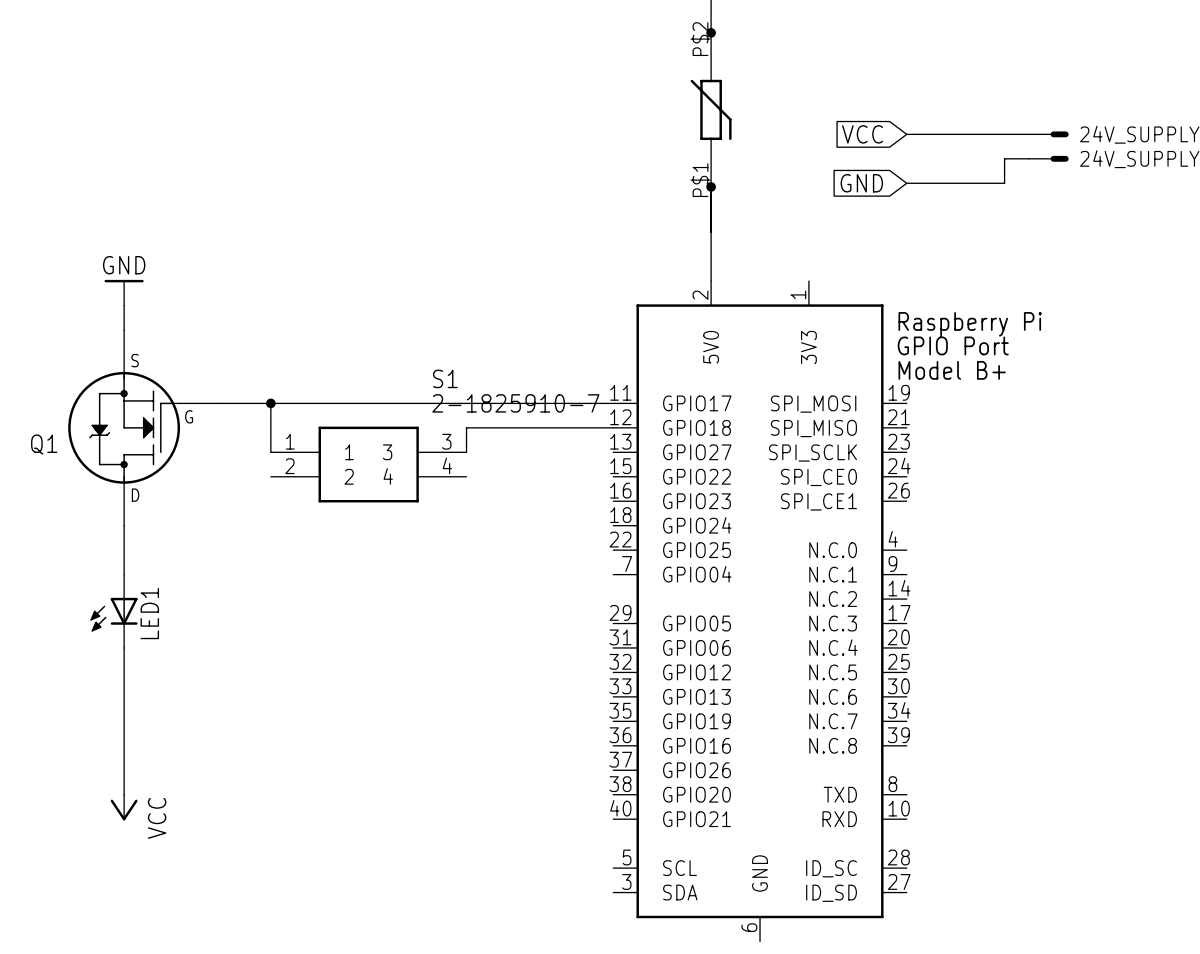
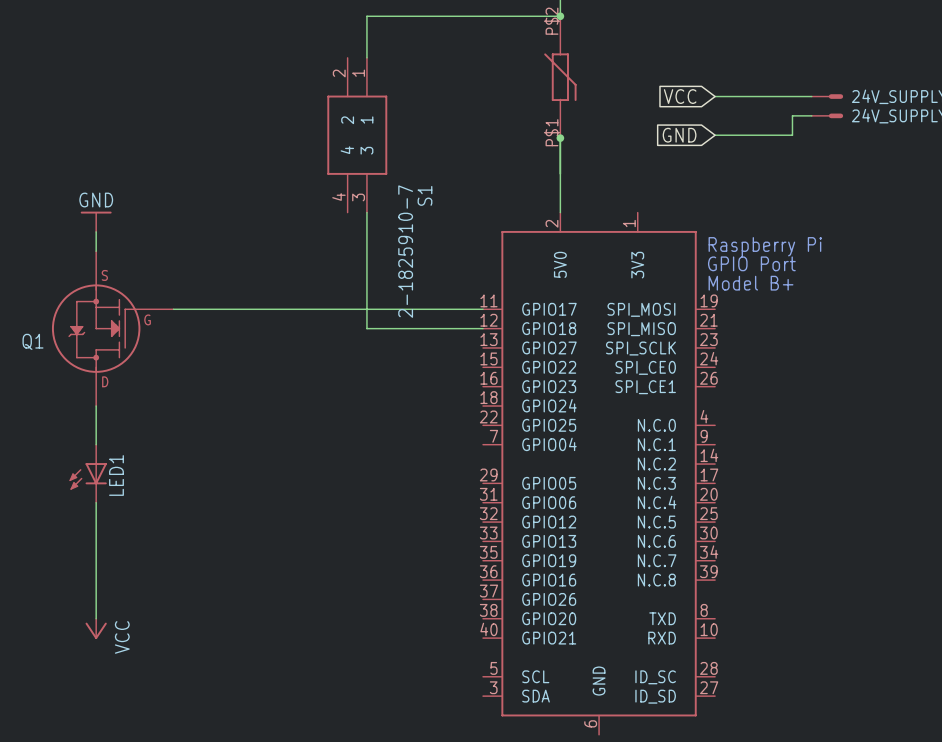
wire: none -> (560, 16) (366, 16) (366, 57)
wire: (270, 403) (270, 452) -> none
junction: (270, 403) -> none
wire: (466, 427) (466, 452) -> (366, 328) (366, 212)
S1 rotation: 0° (368, 464) -> 90° clockwise (357, 135)
S1 position: (368, 464) -> (357, 135)

